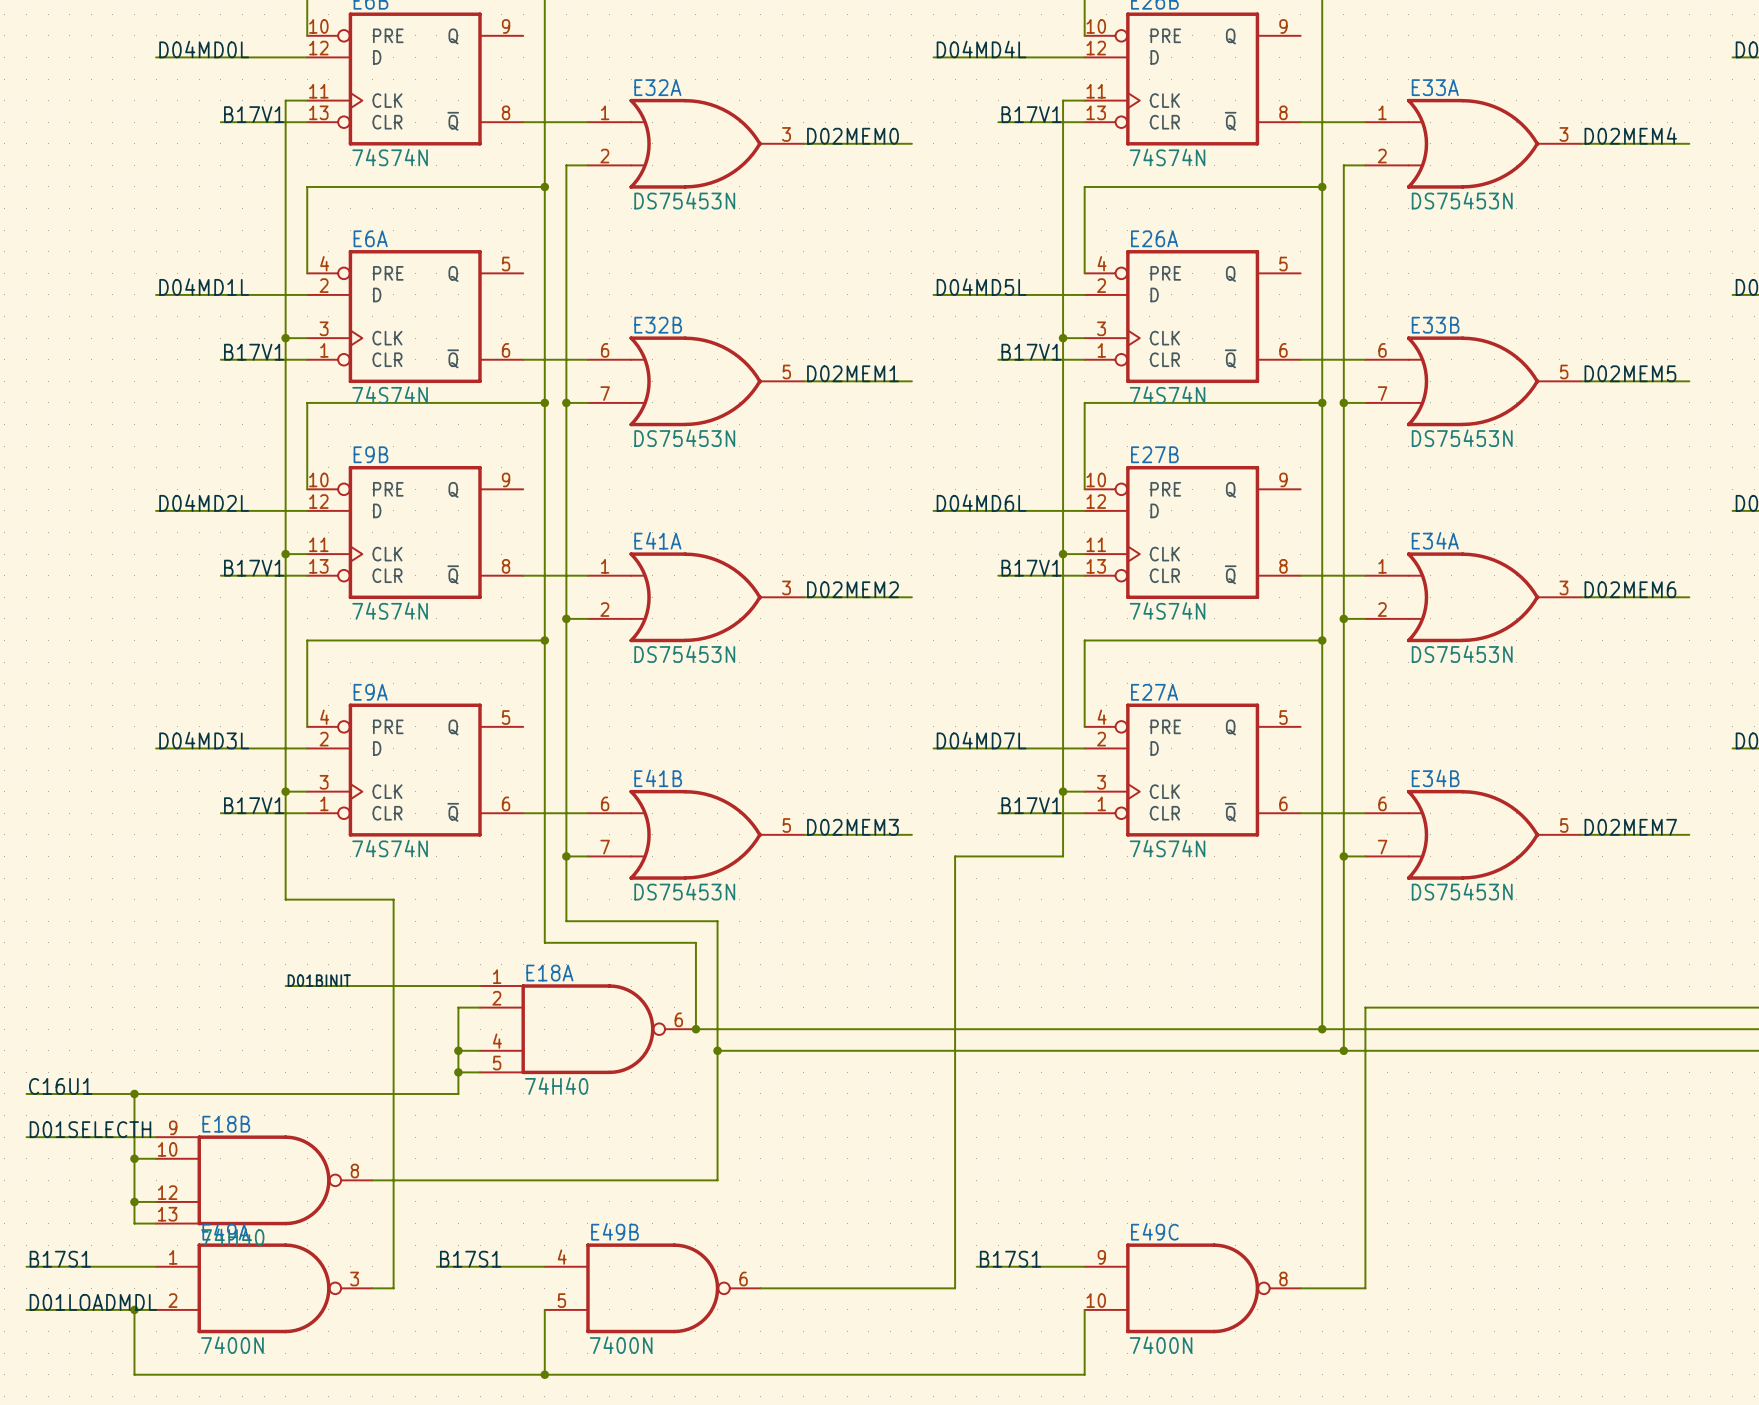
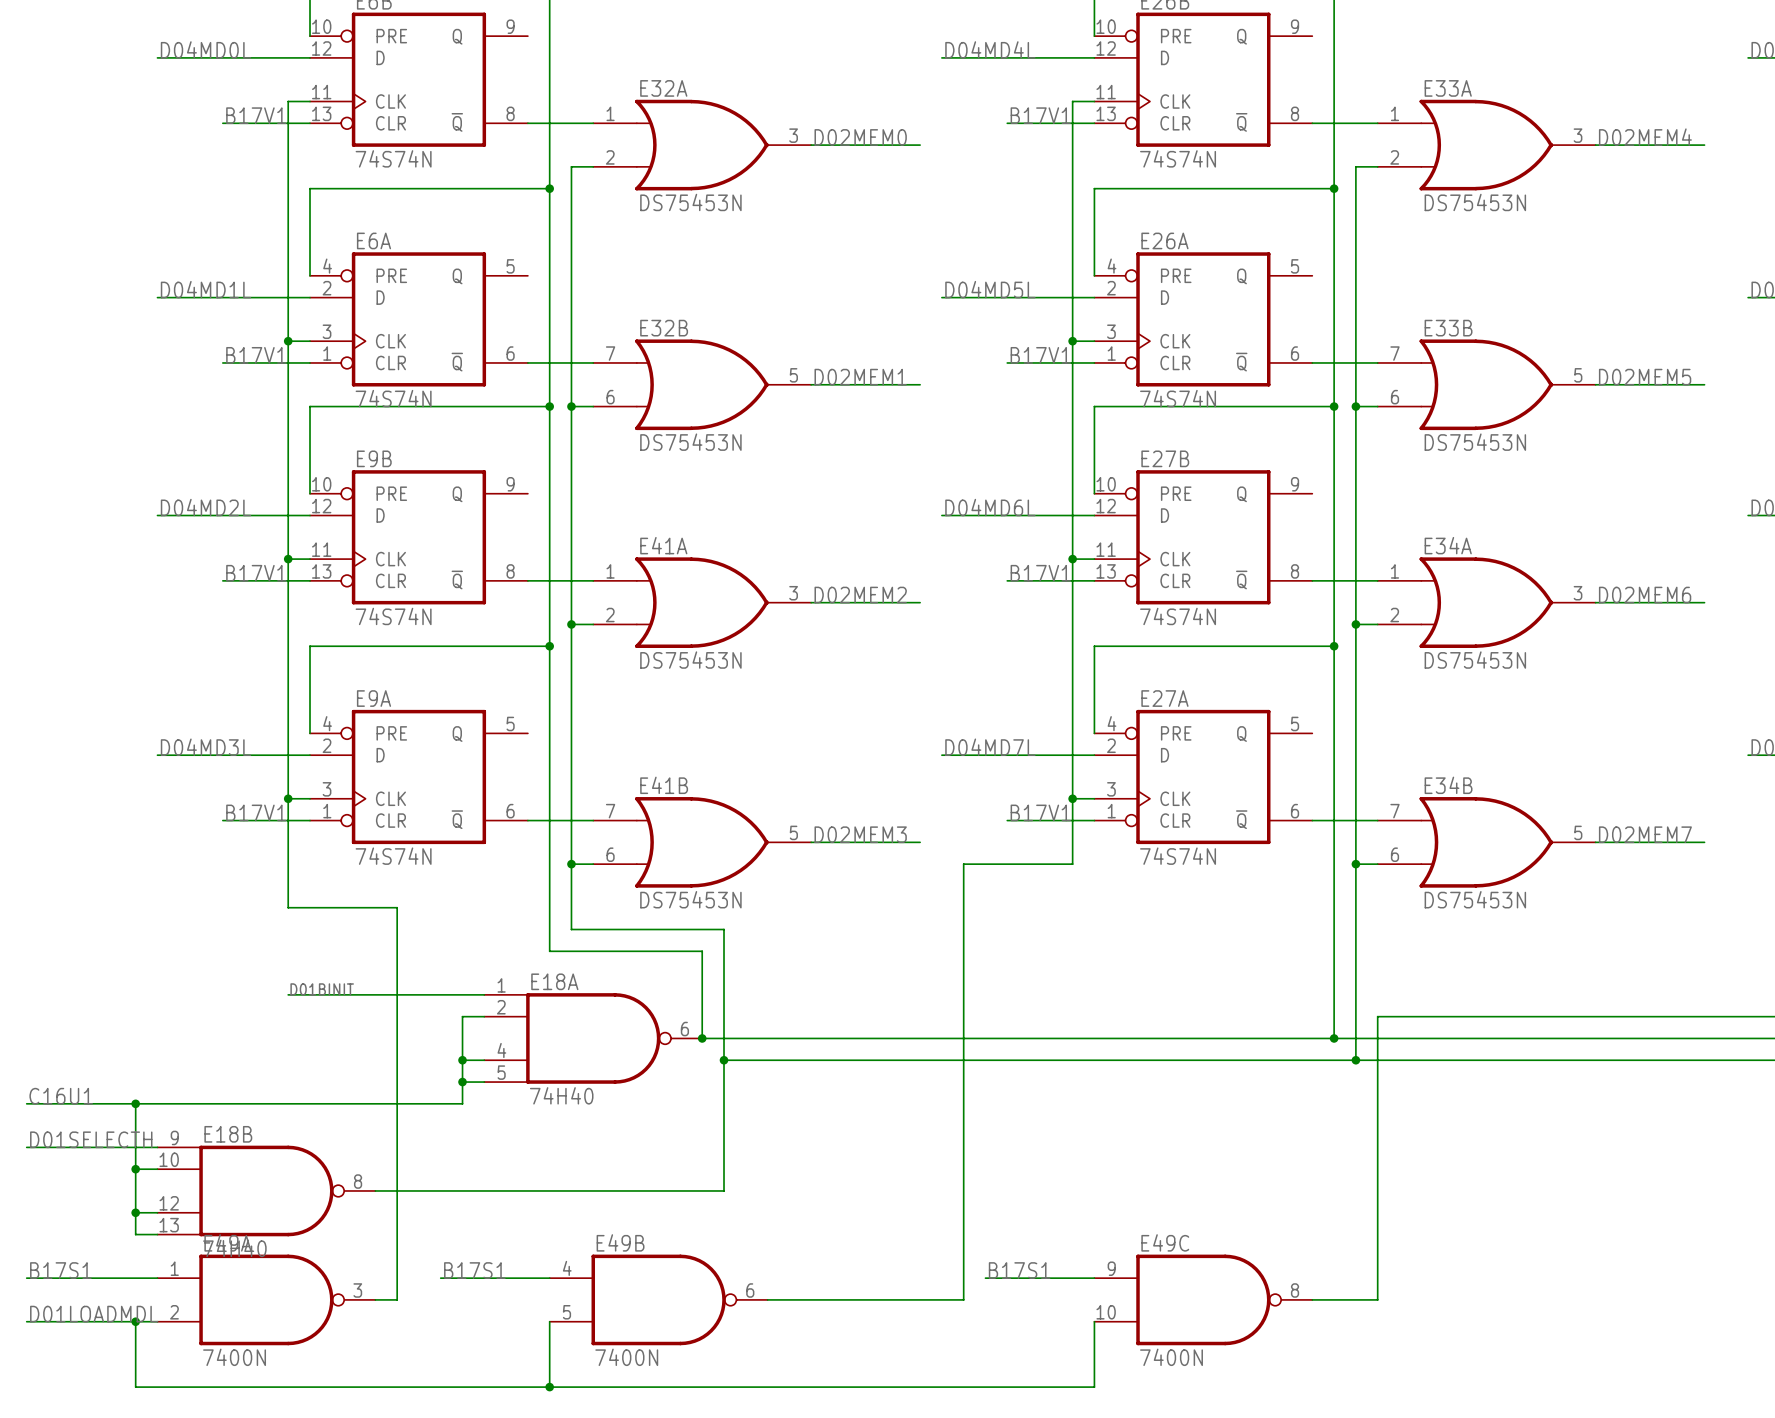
E32B symbol: [587, 336, 804, 427] -> [593, 339, 812, 431]
E33B symbol: [1365, 336, 1582, 427] -> [1377, 339, 1596, 431]
E41B symbol: [587, 789, 804, 880] -> [593, 797, 812, 888]
E34B symbol: [1365, 789, 1582, 880] -> [1377, 797, 1596, 888]

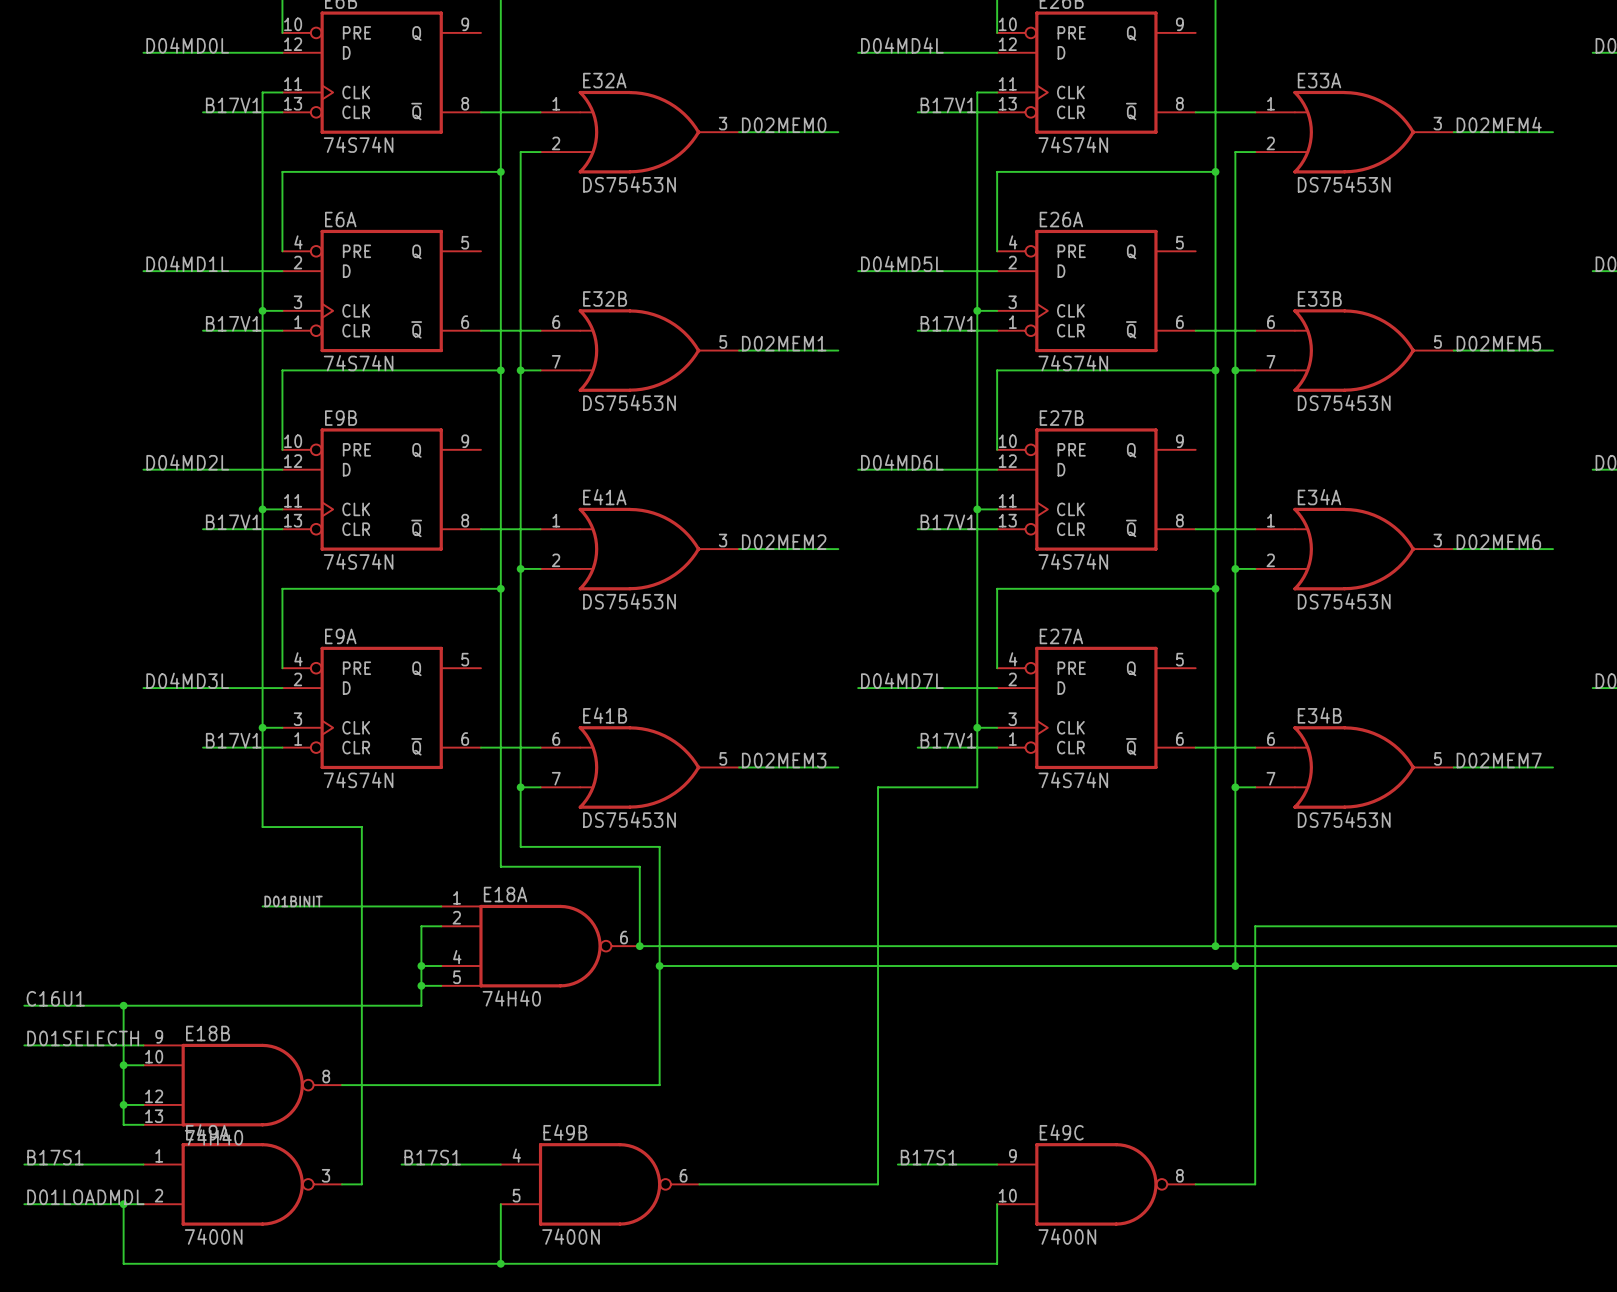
E32B symbol: [593, 339, 812, 431] -> [540, 309, 740, 392]
E33B symbol: [1377, 339, 1596, 431] -> [1255, 309, 1454, 392]
E41B symbol: [593, 797, 812, 888] -> [540, 726, 740, 809]
E34B symbol: [1377, 797, 1596, 888] -> [1255, 726, 1454, 809]

